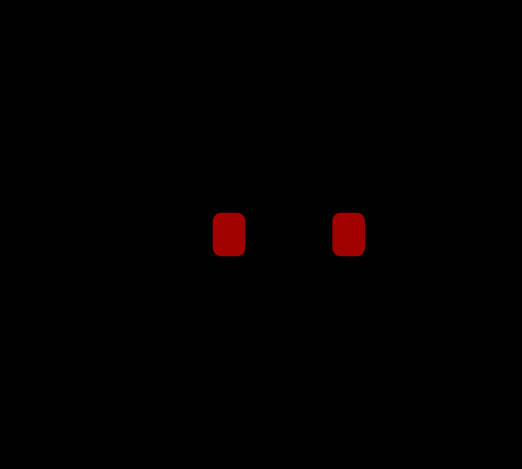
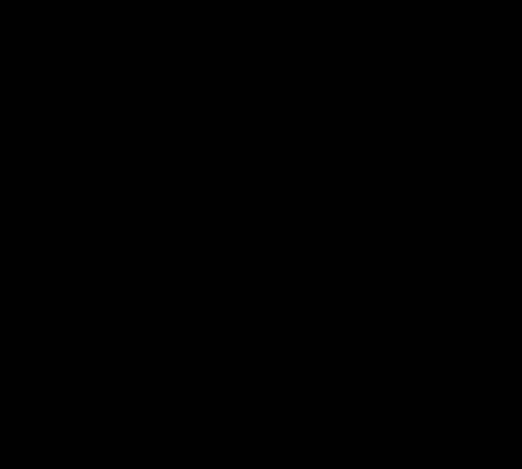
part: (288, 234) -> none

